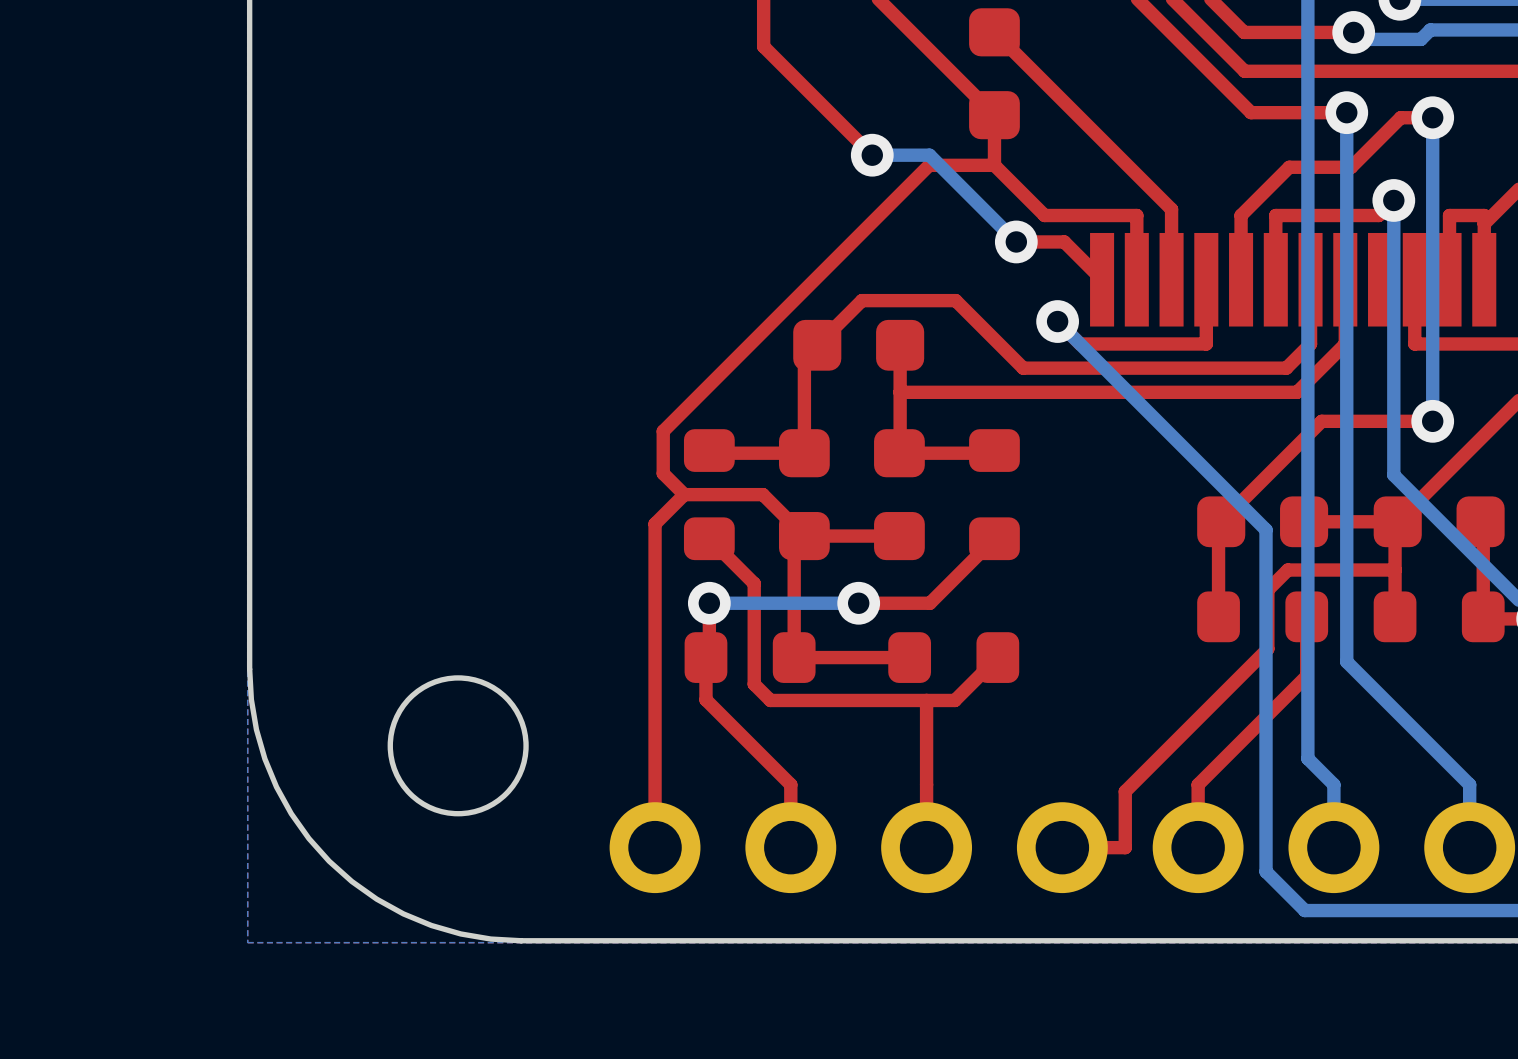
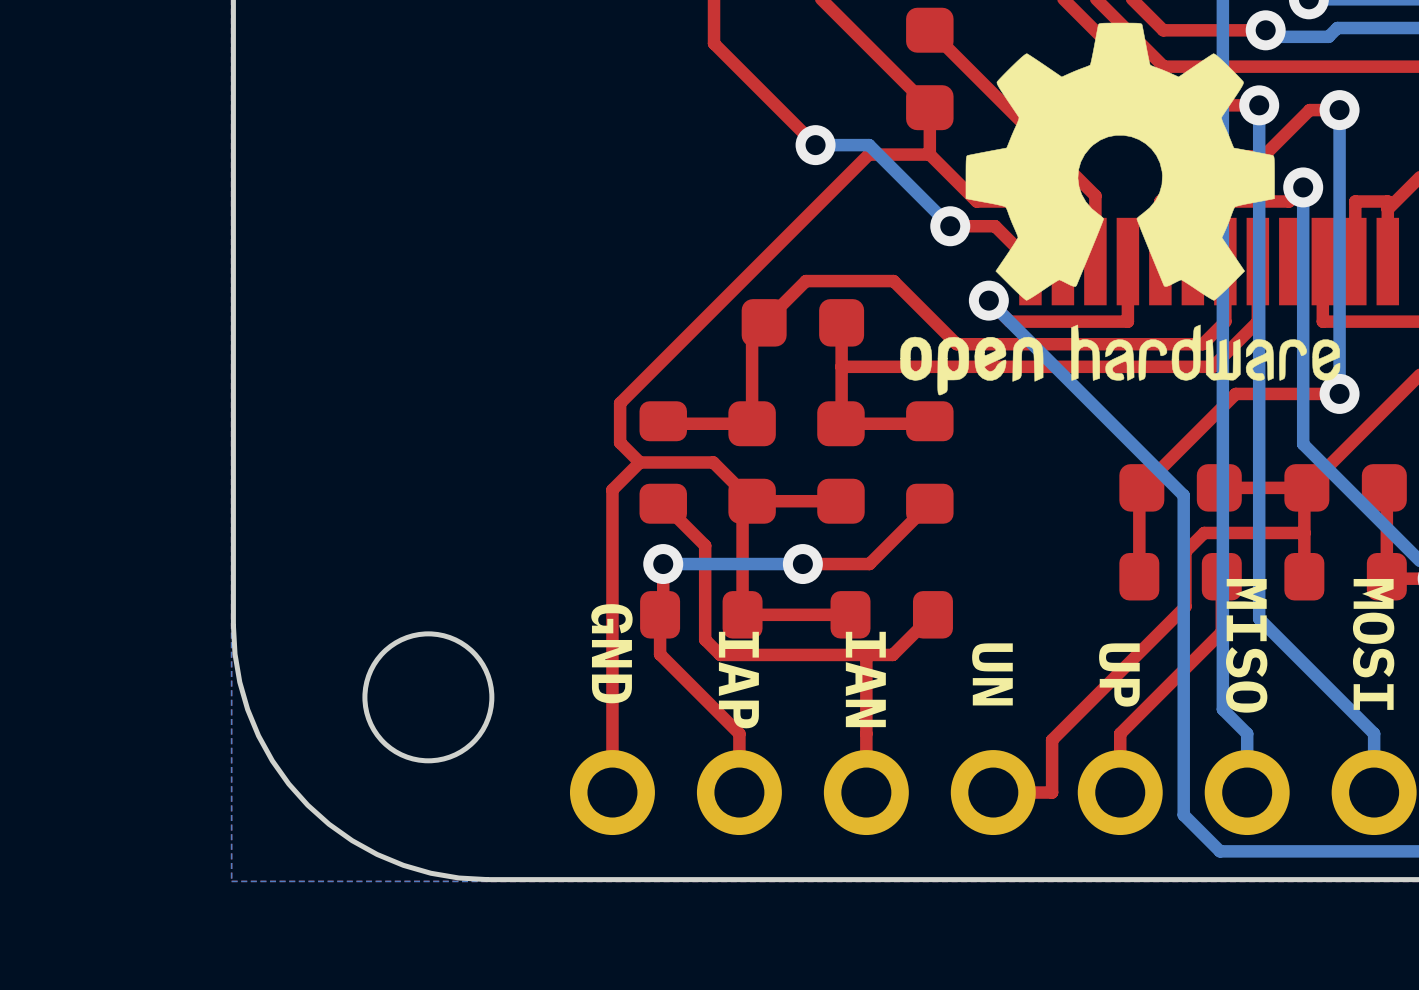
drawing: none -> [900, 22, 1341, 396]
text: none -> MOSI (1373, 644)
text: none -> MISO (1246, 645)
text: none -> GND (611, 653)
text: none -> UN (992, 674)
text: none -> UP (1119, 675)
text: none -> IAN (865, 679)
text: none -> IAP (738, 680)

